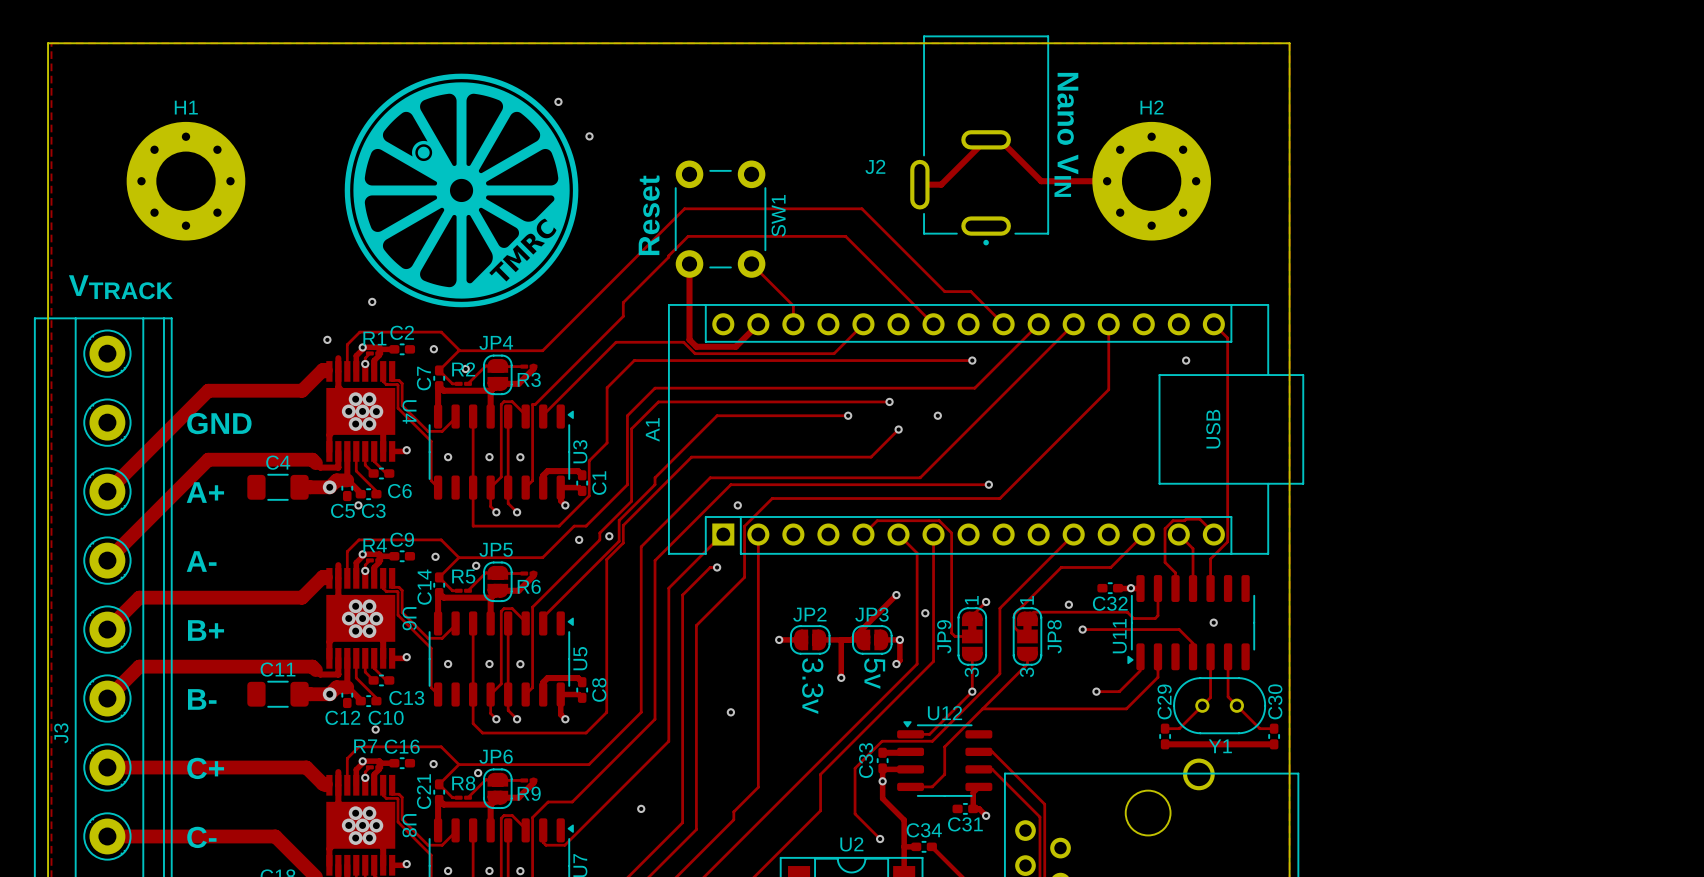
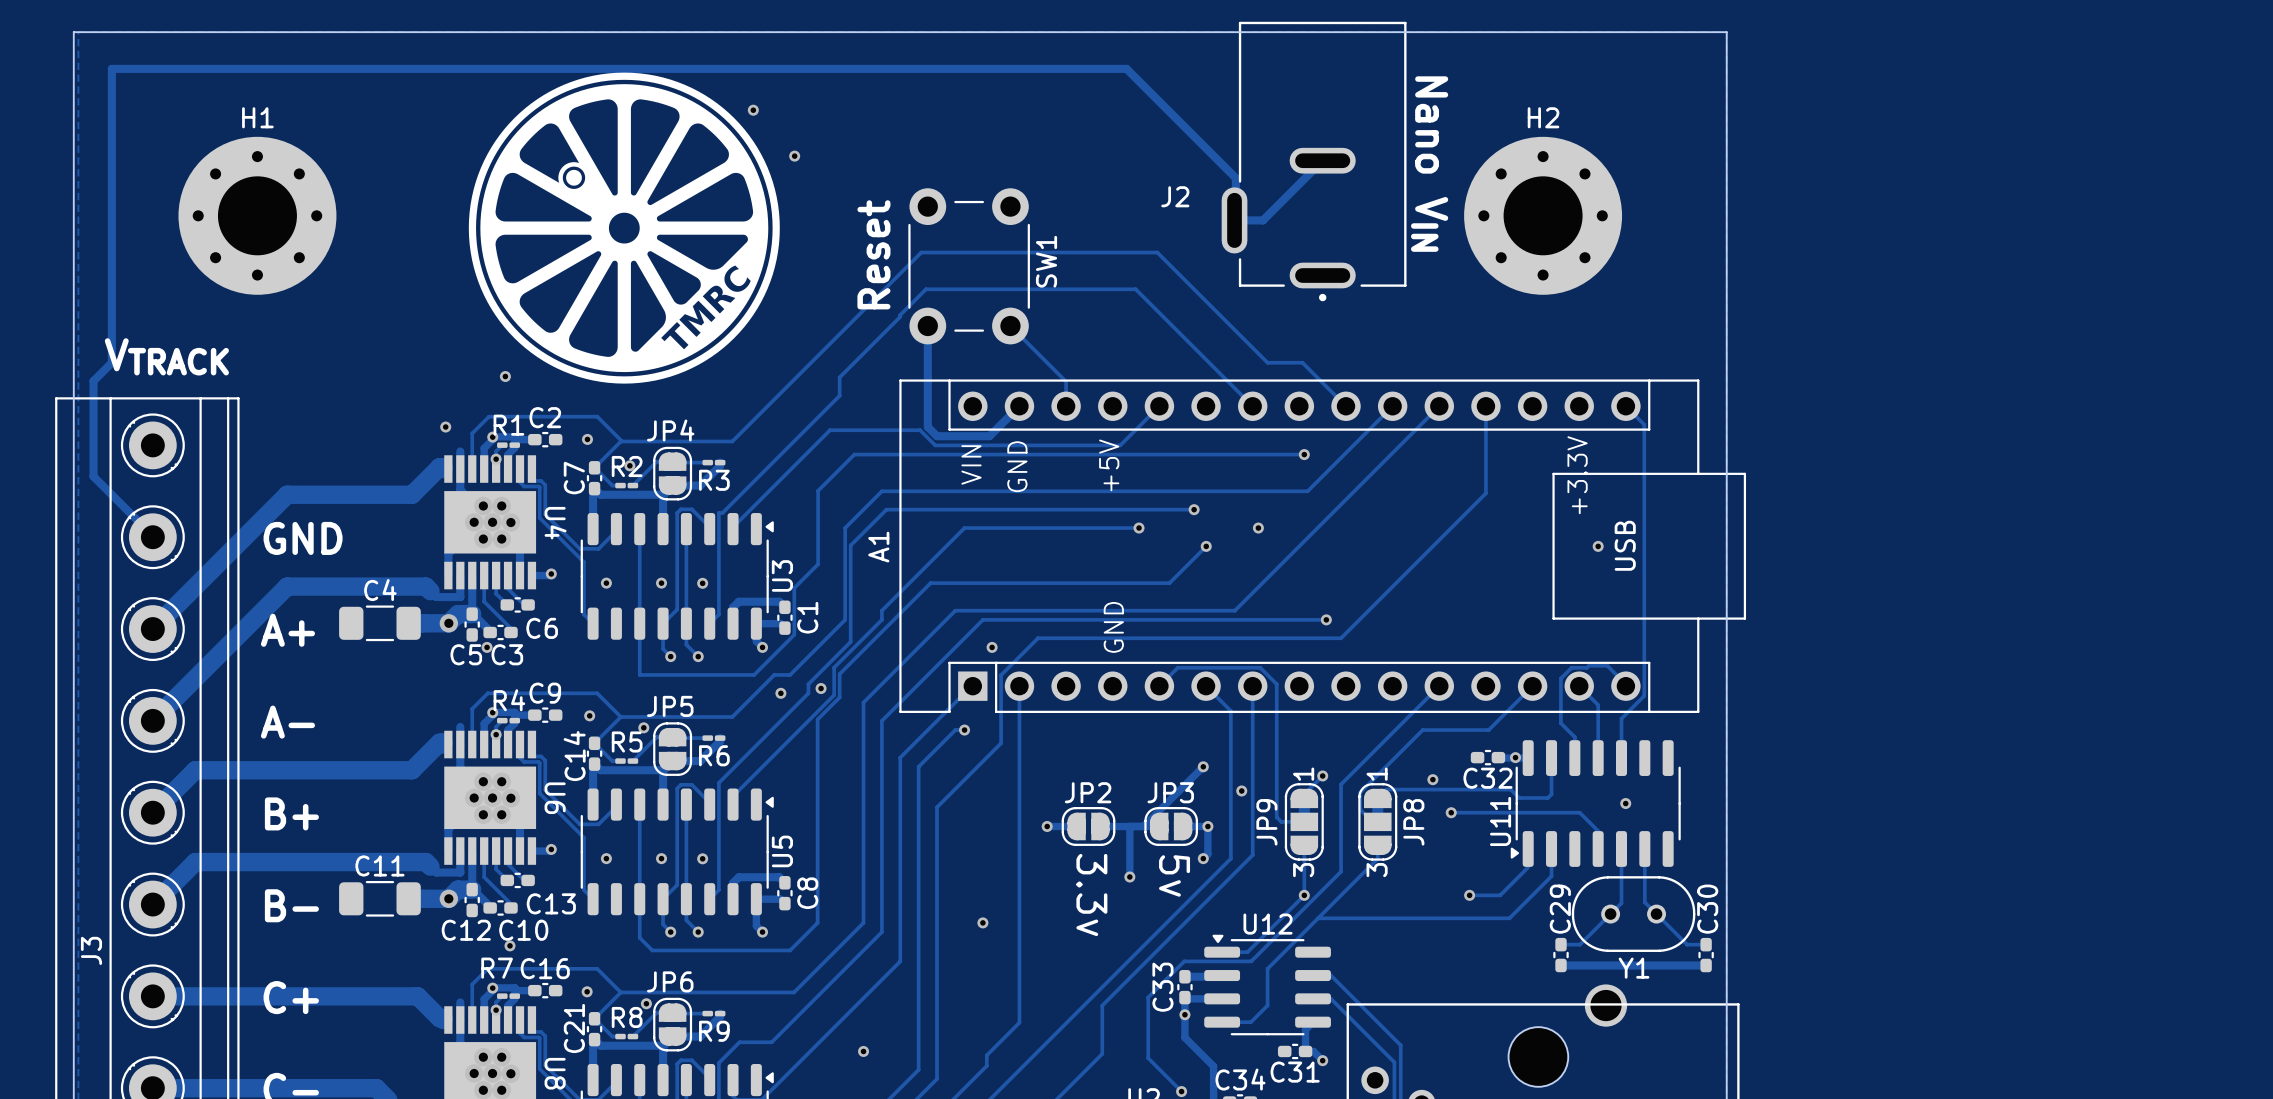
track: (999, 139) (1041, 181) (1151, 181) -> none
track: none -> (1235, 220) (1235, 178) (1126, 68) (111, 68) (111, 362) (93, 381) (93, 476) (154, 537)
via position: (1186, 360) -> (1598, 546)
text: none -> VIN (971, 464)
text: none -> GND (1017, 466)
text: none -> +5V (1109, 465)
text: none -> +3.3V (1577, 475)
text: none -> GND (1113, 627)

